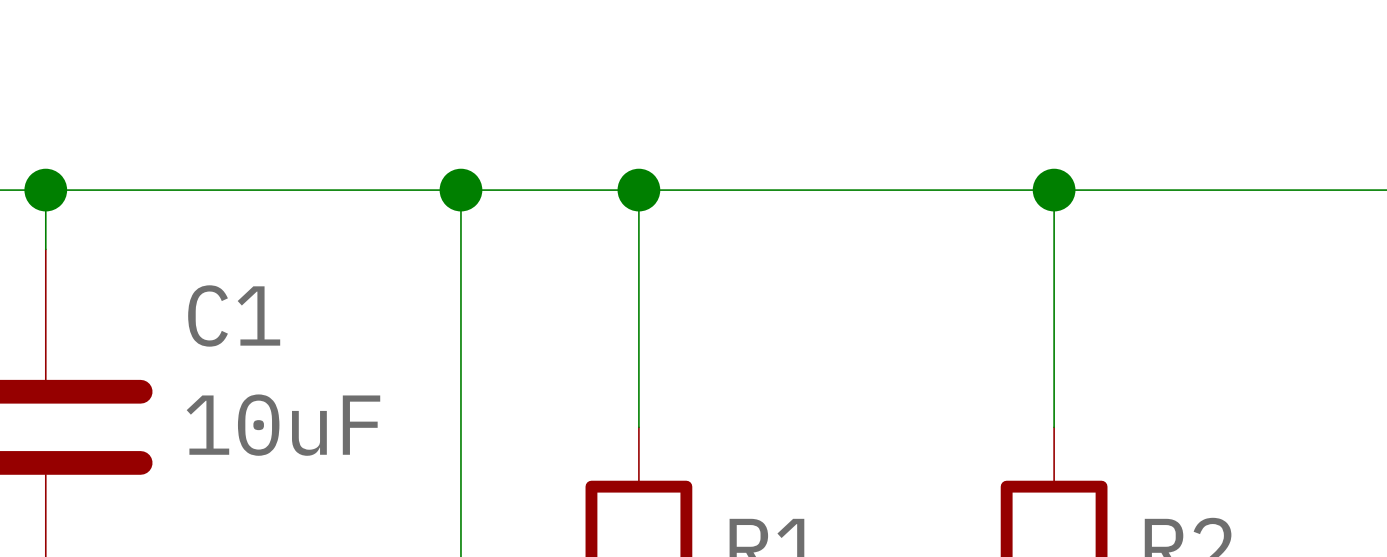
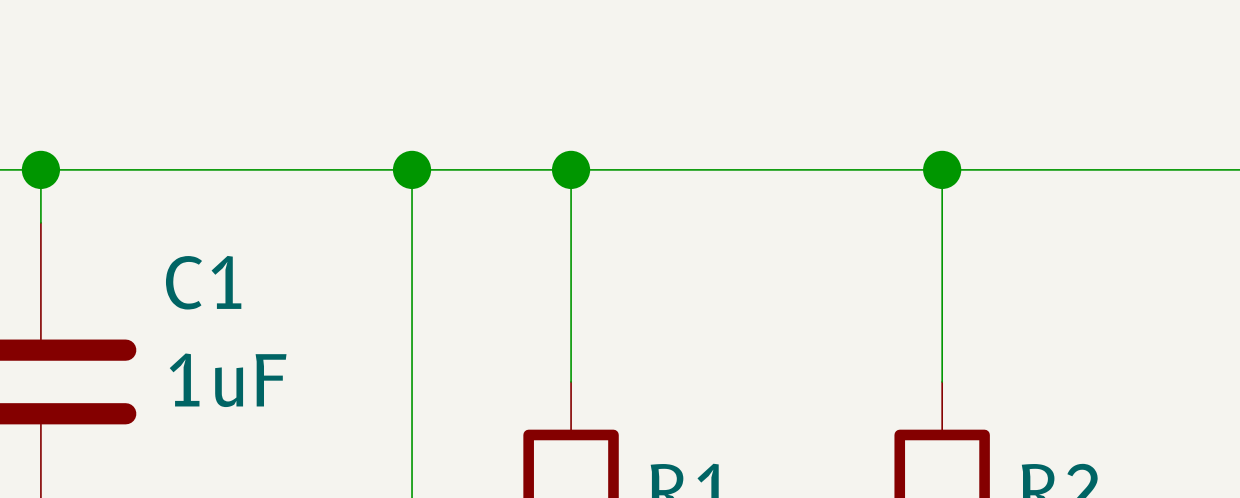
C1 value: 10uF (283, 425) -> 1uF (228, 380)

